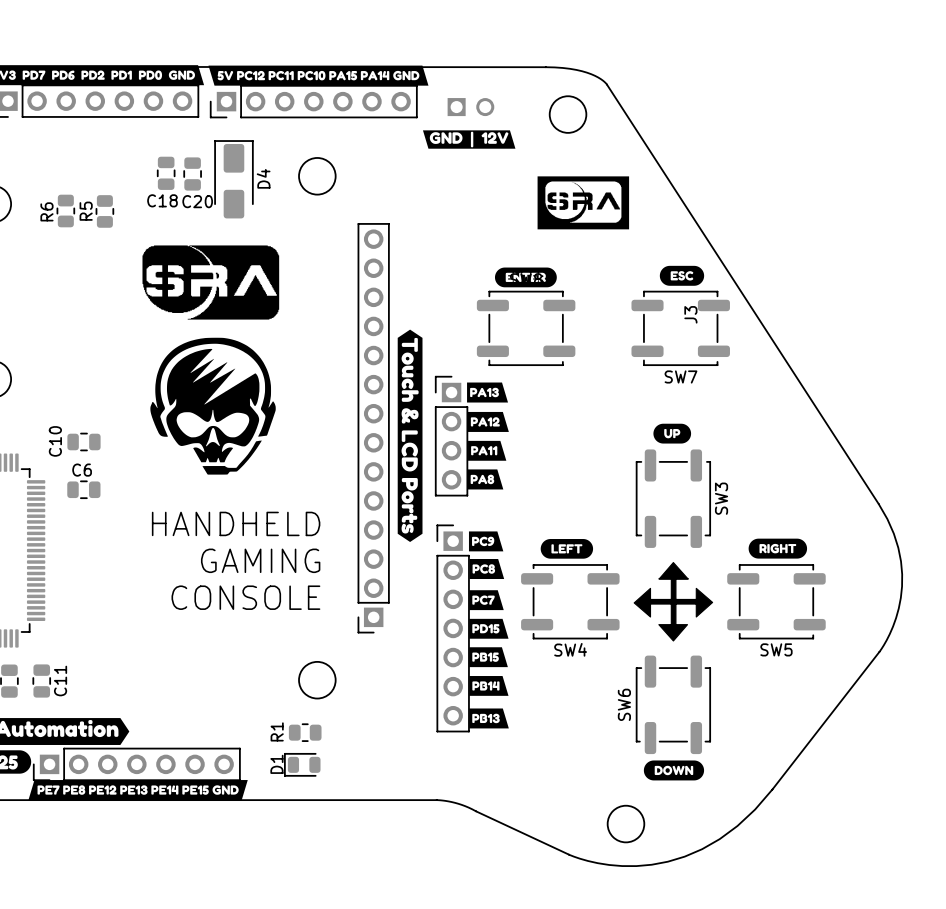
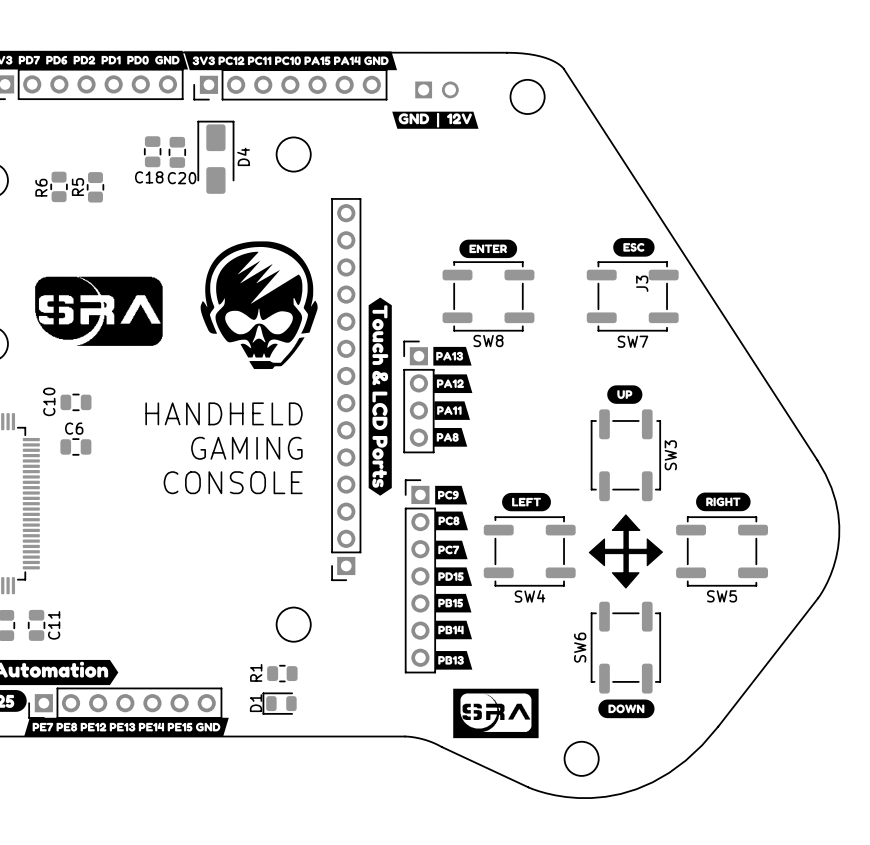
drawing shape: [208, 65, 429, 86] -> [184, 51, 398, 71]
drawing: [537, 176, 630, 230] -> none
drawing position: (210, 282) -> (98, 311)
SW8 rotation: 0° (526, 328) -> 180° (488, 296)
drawing position: (213, 406) -> (259, 305)
text: none -> HANDHELD (224, 413)
text: HANDHELD (236, 523) -> CONSOLE (233, 482)
text position: GAMING (260, 560) -> GAMING (246, 448)
text: CONSOLE (245, 597) -> none
drawing: none -> [453, 688, 539, 739]

